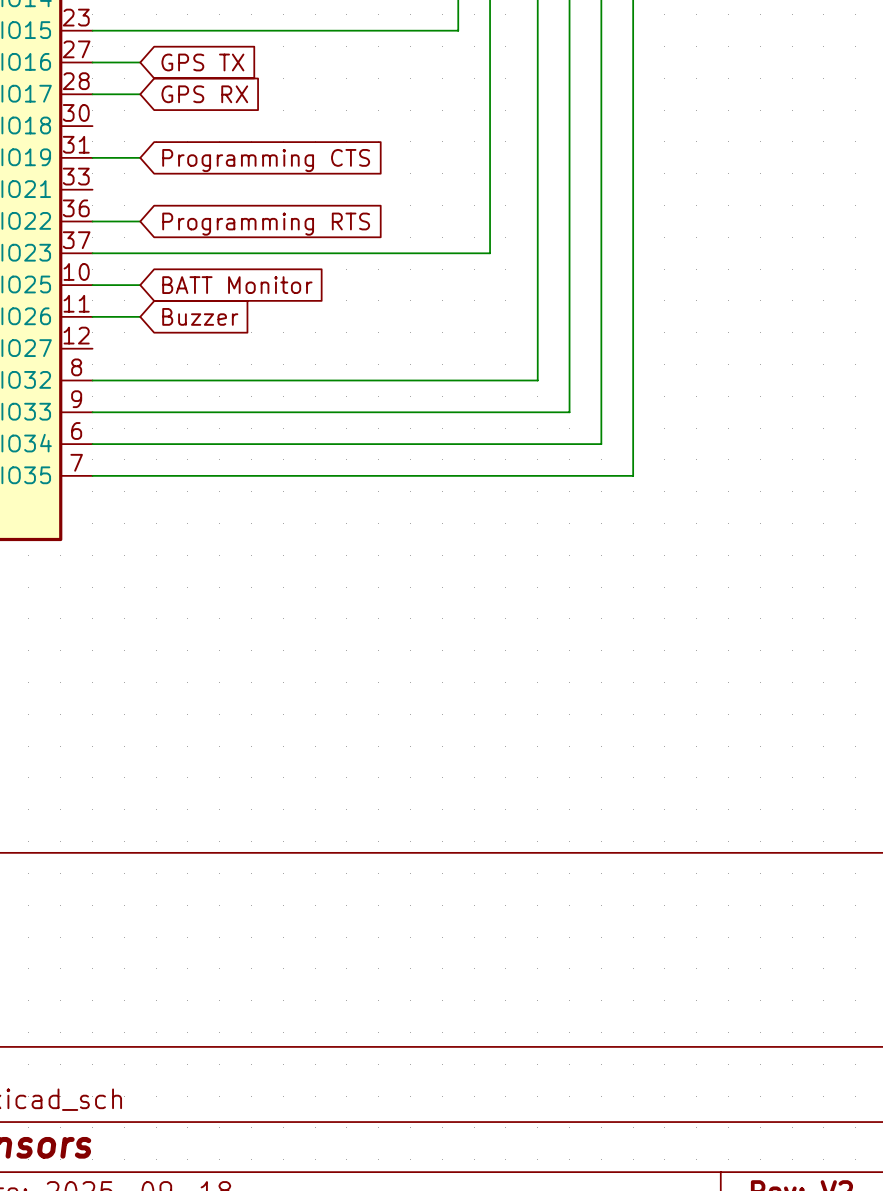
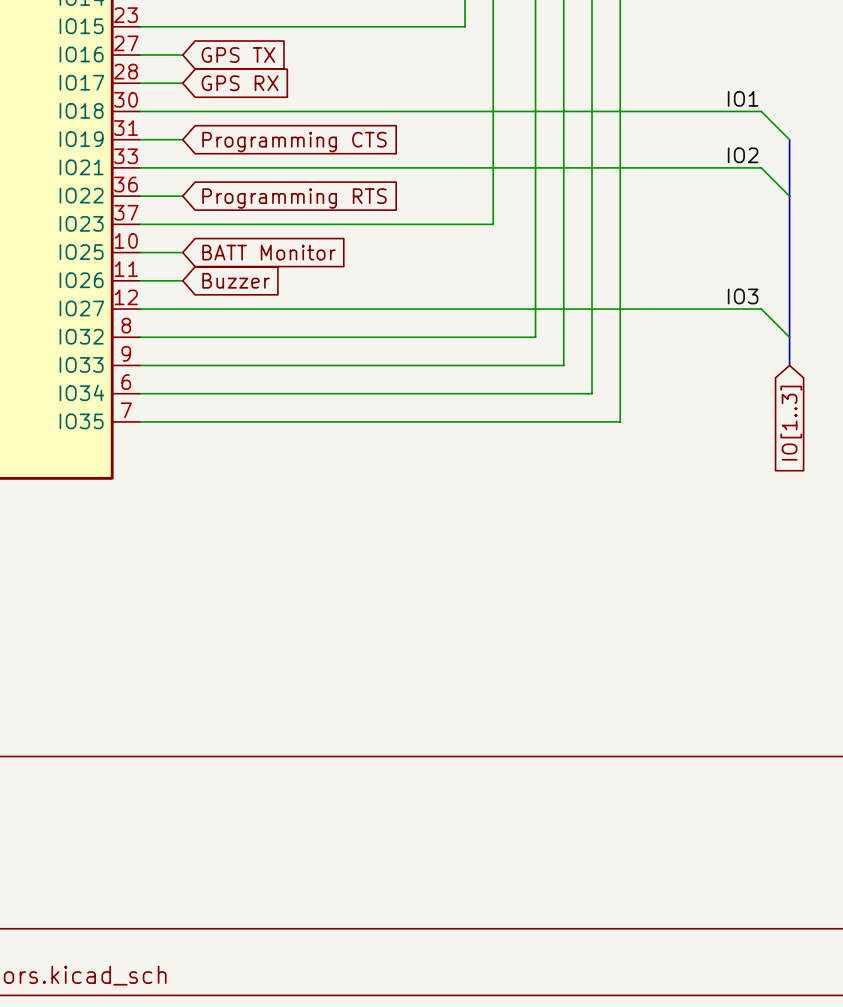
label: none -> IO1 (743, 98)
wire: none -> (140, 111) (761, 111) (789, 139)
bus: none -> (789, 139) (789, 365)
label: none -> IO2 (743, 155)
wire: none -> (140, 167) (761, 167) (789, 196)
label: none -> IO3 (743, 296)
wire: none -> (140, 309) (761, 309) (789, 337)
global label: none -> IO[1..3] (791, 423)

